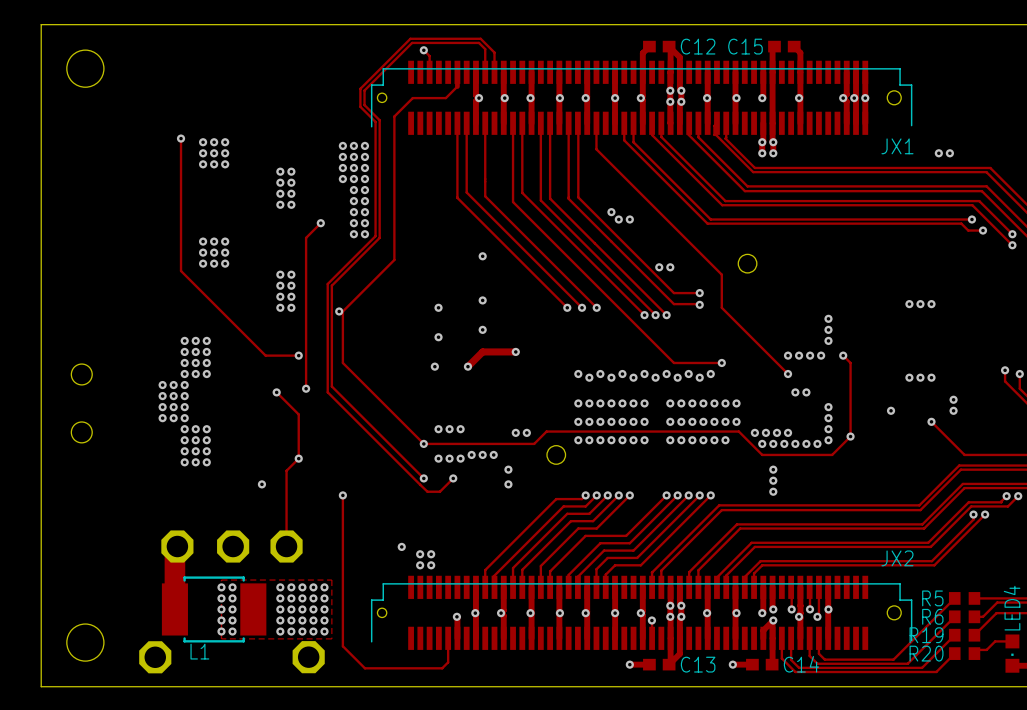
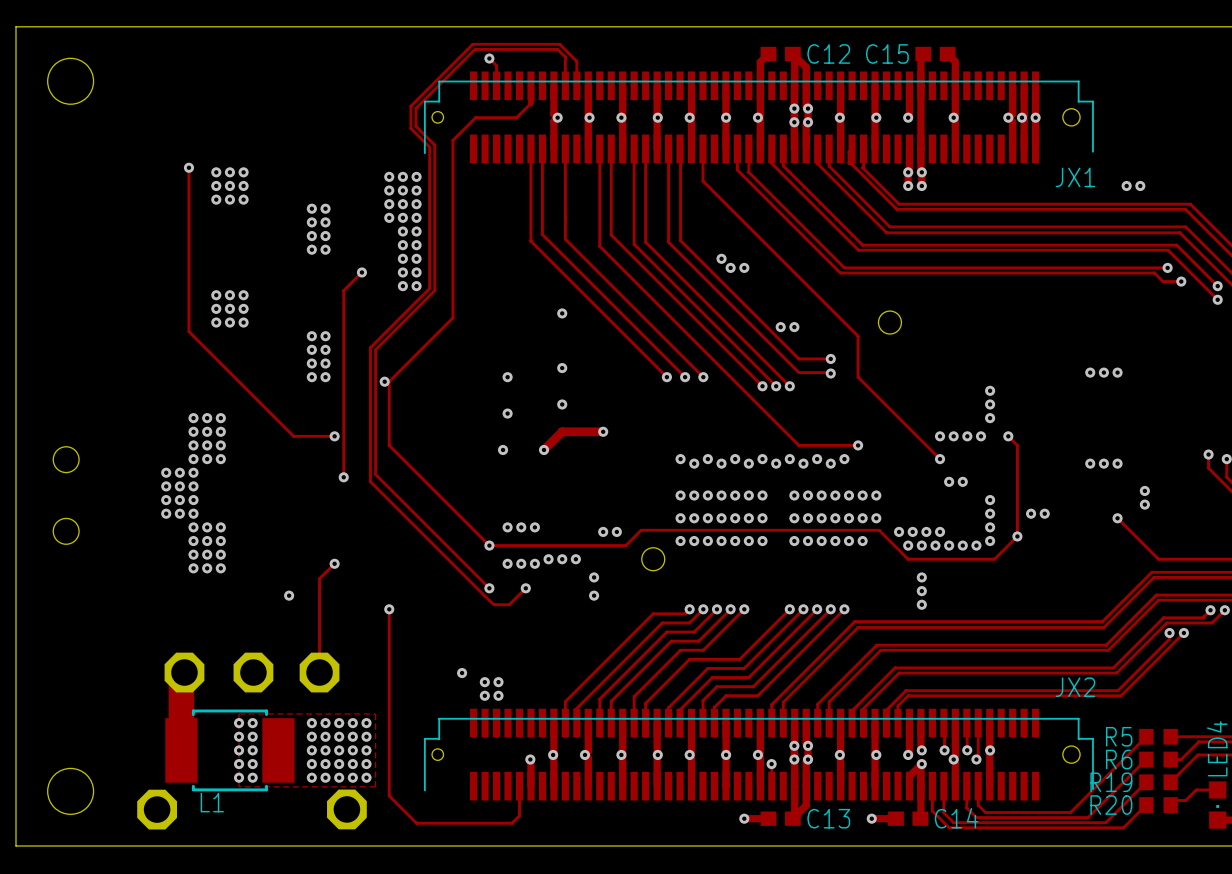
track: (276, 392) (298, 414) (298, 458) -> none
via: (276, 392) -> none
via: (891, 410) -> none
via: none -> (1031, 513)
via: none -> (1044, 513)

